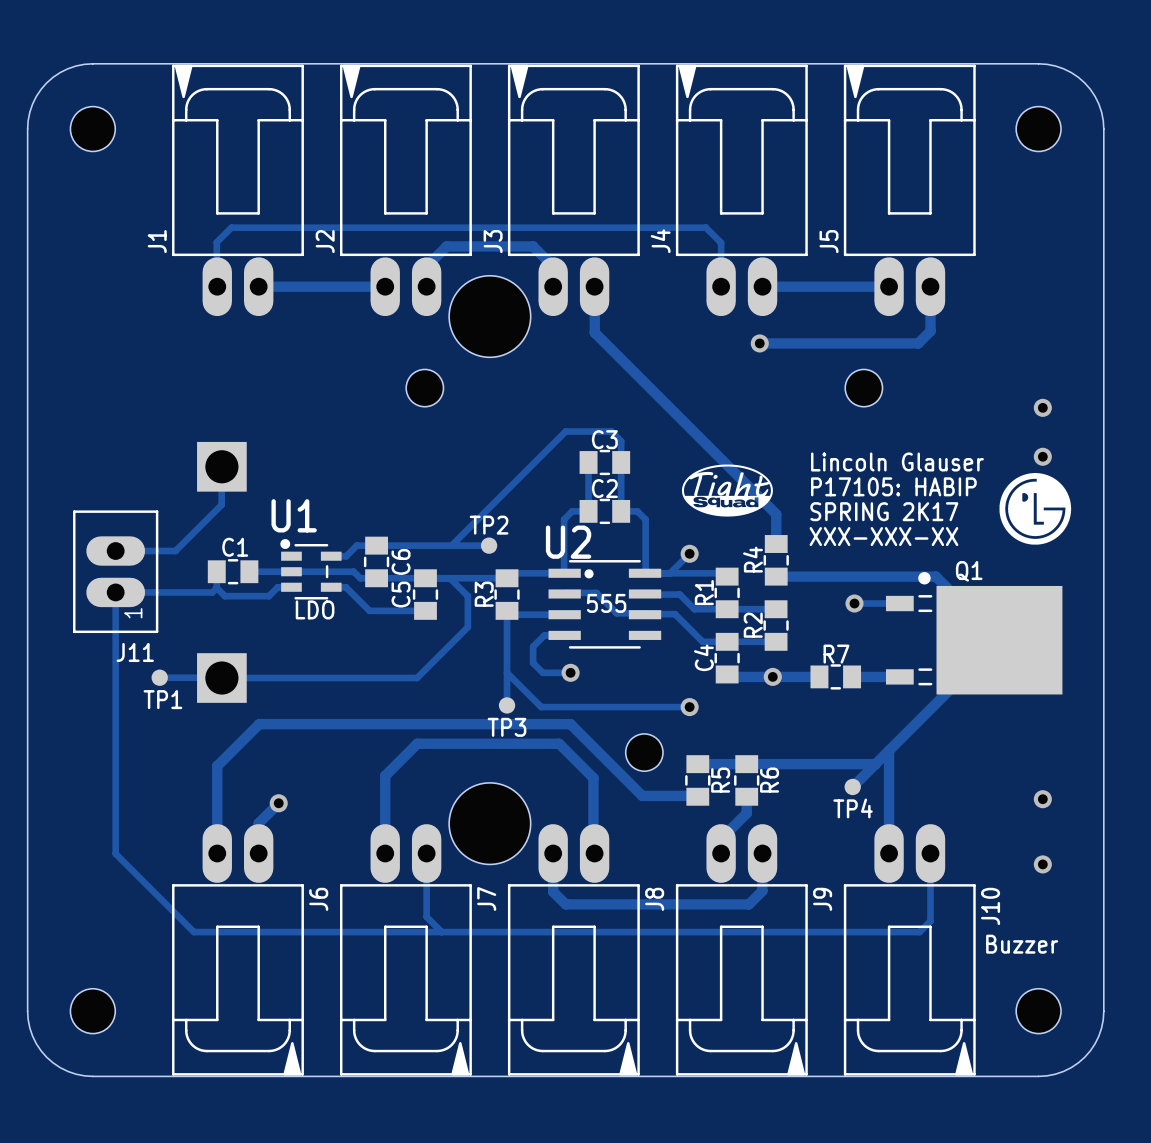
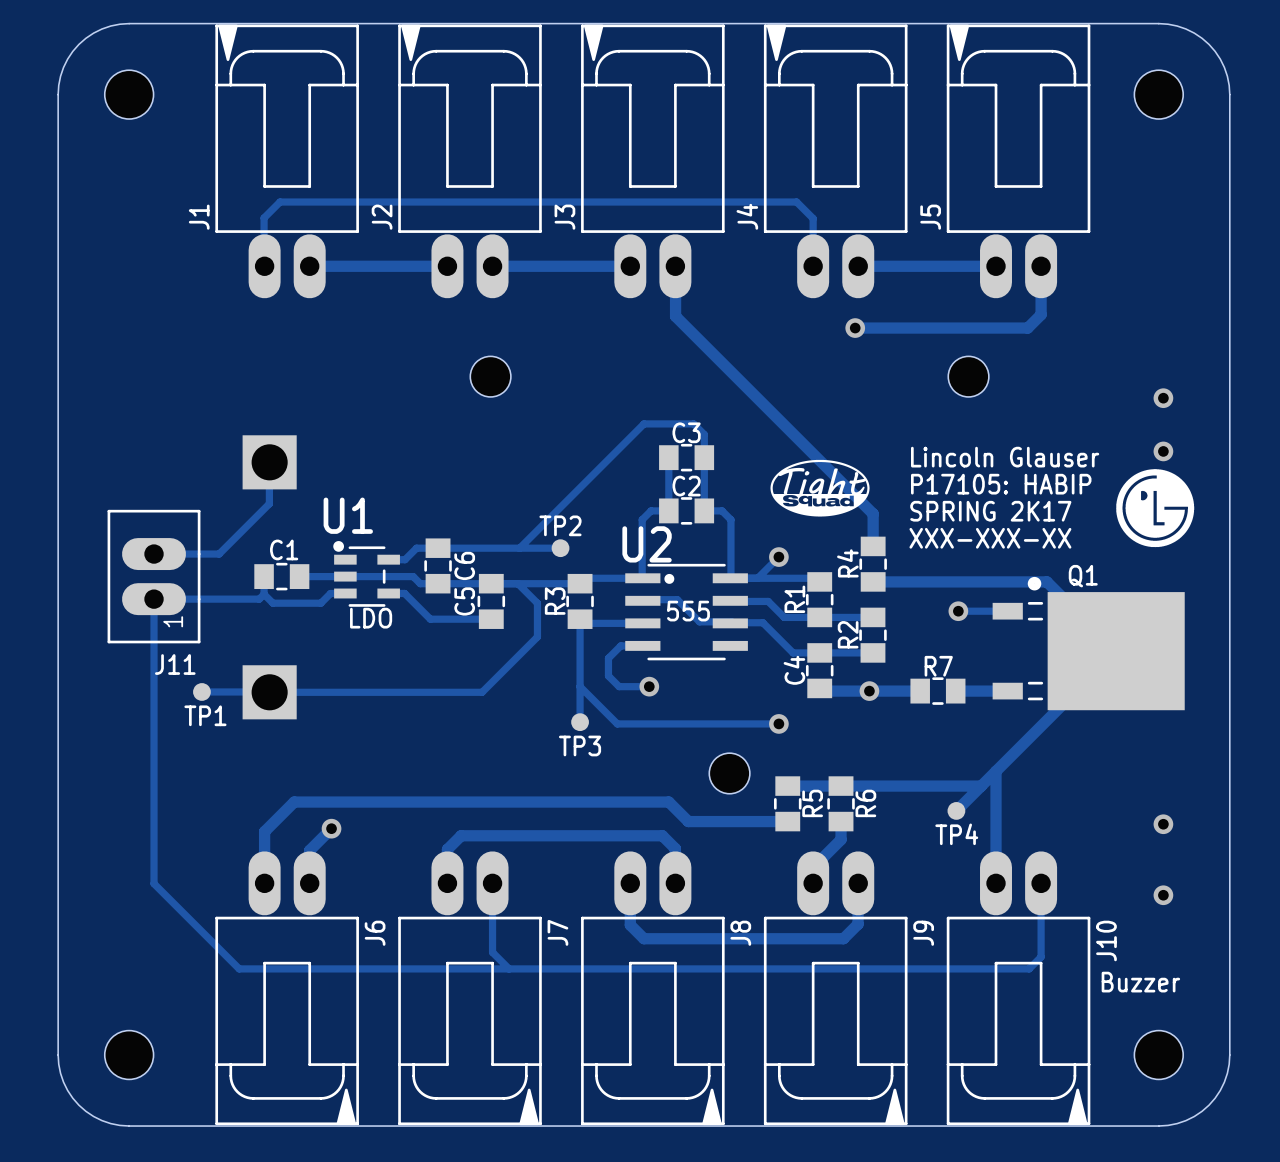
track: (426, 286) (426, 266) (446, 246) (533, 246) (552, 265) (553, 286) -> (492, 266) (630, 266)
hole: (489, 316) -> none
track: (697, 796) (642, 795) (570, 724) (259, 724) (217, 766) (217, 806) -> (787, 821) (688, 821) (668, 802) (294, 802) (264, 831)
track: (385, 822) (385, 775) (417, 743) (559, 743) (593, 778) (594, 853) -> (447, 849) (461, 835) (662, 835) (675, 848) (675, 883)
hole: (489, 823) -> none

